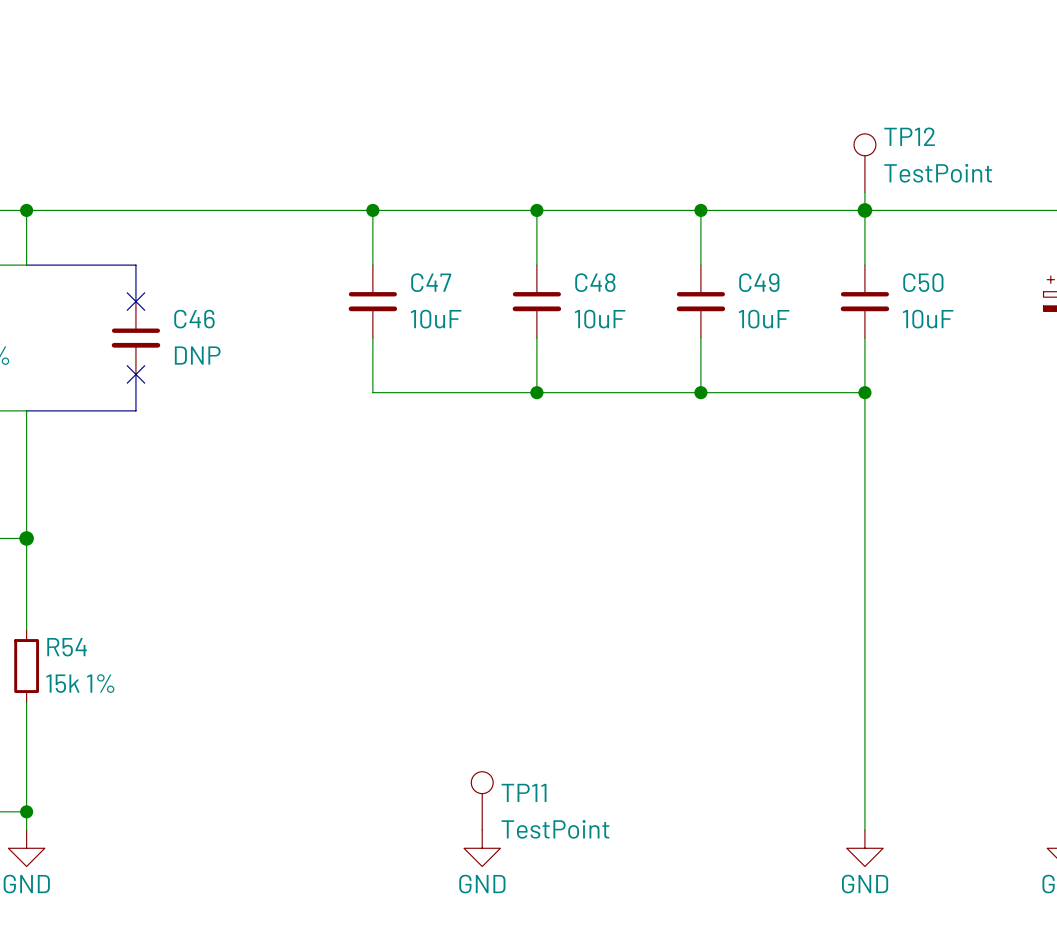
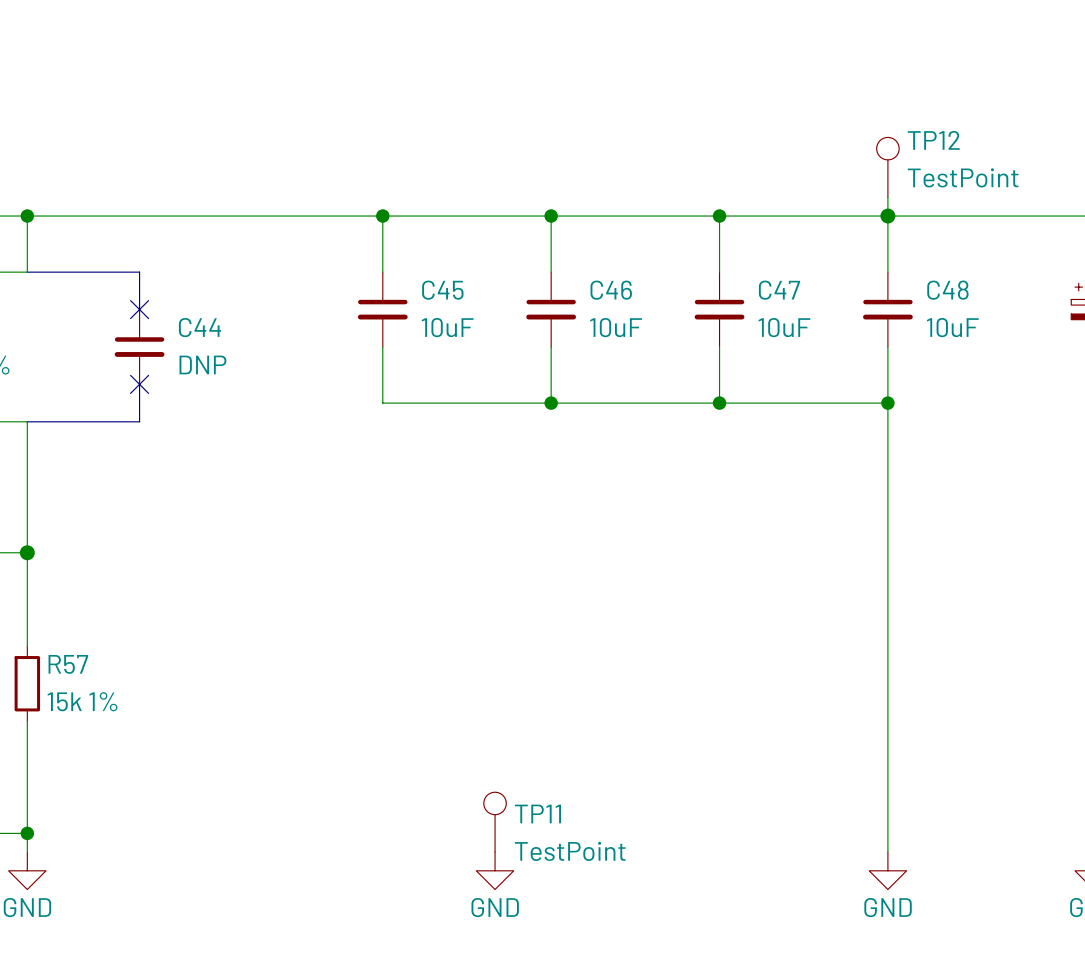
C47 name: C47 (431, 282) -> C45 (442, 290)
C48 name: C48 (595, 282) -> C46 (611, 290)
C49 name: C49 (759, 282) -> C47 (779, 290)
C50 name: C50 (923, 282) -> C48 (947, 290)
C46 name: C46 (194, 319) -> C44 (199, 327)
R54 name: R54 (67, 647) -> R57 (68, 664)

